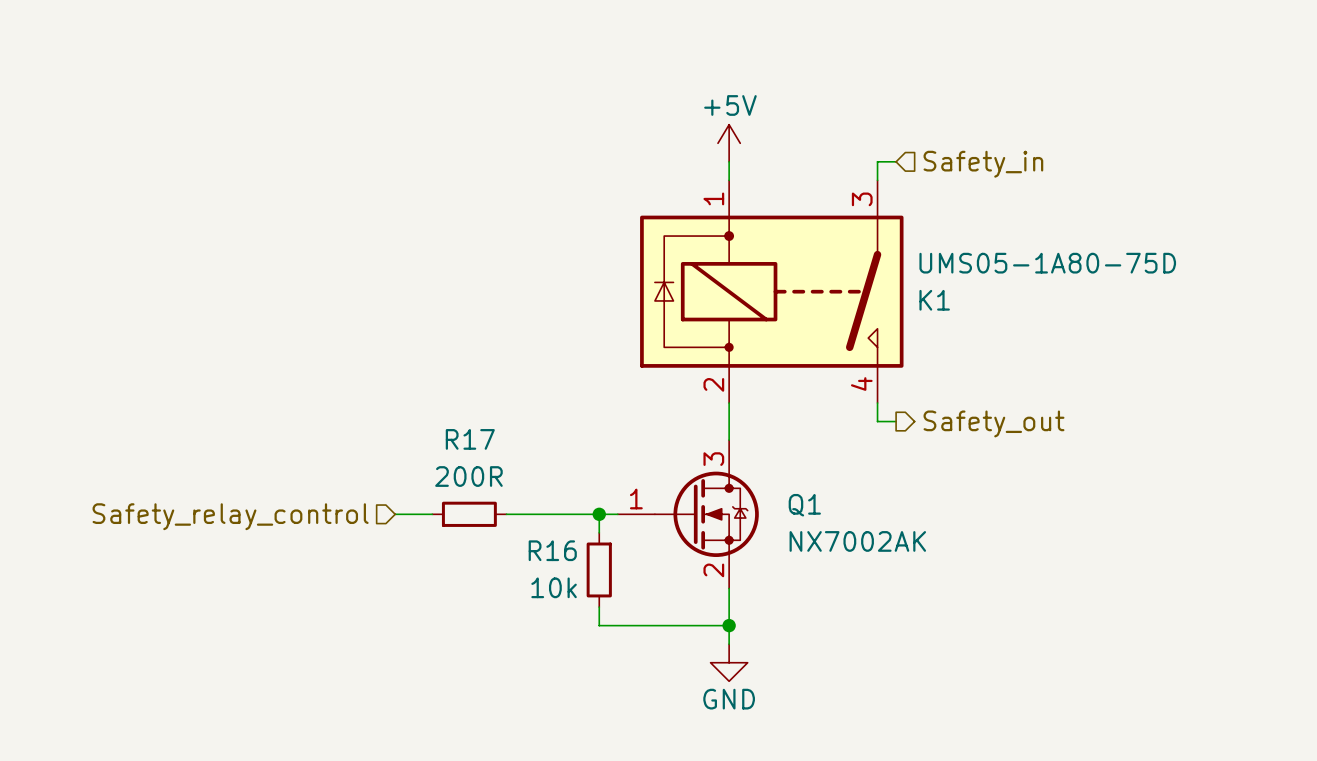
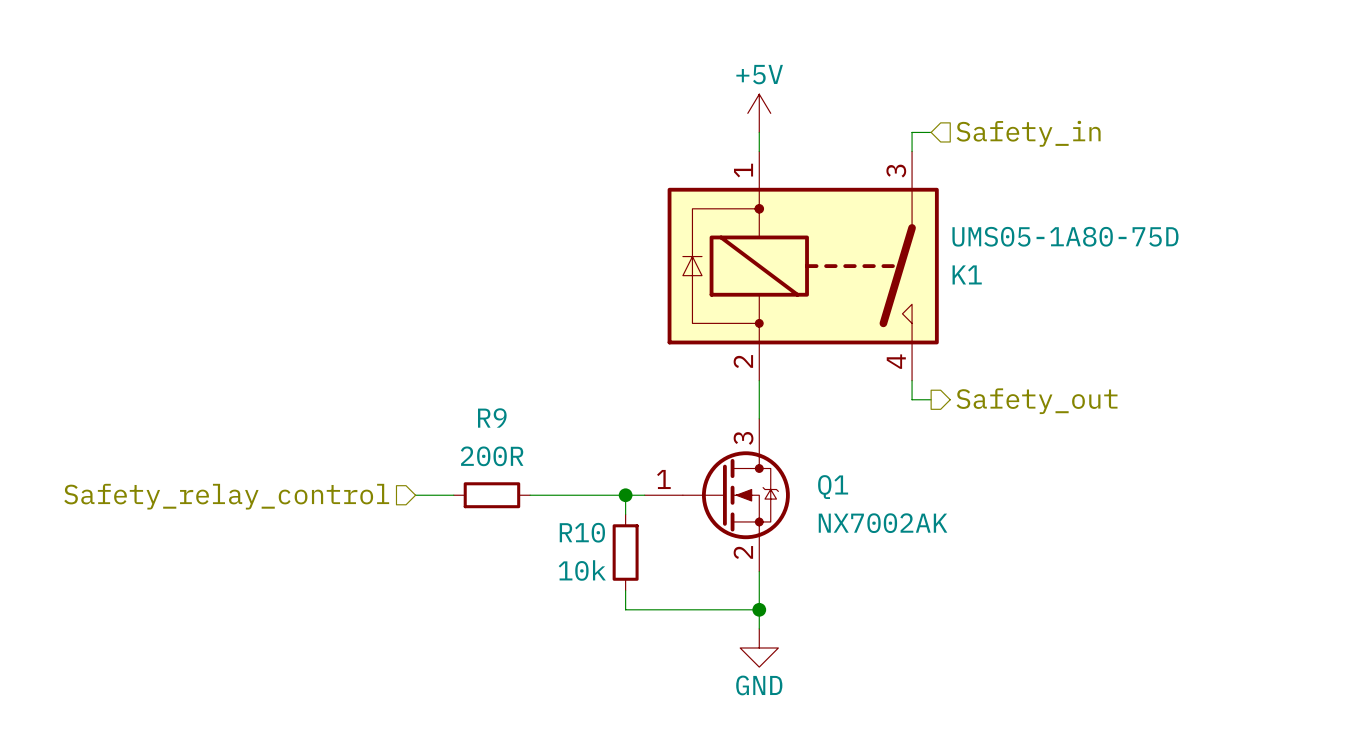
R17 name: R17 (470, 439) -> R9 (492, 417)
R16 name: R16 (552, 550) -> R10 (582, 532)

